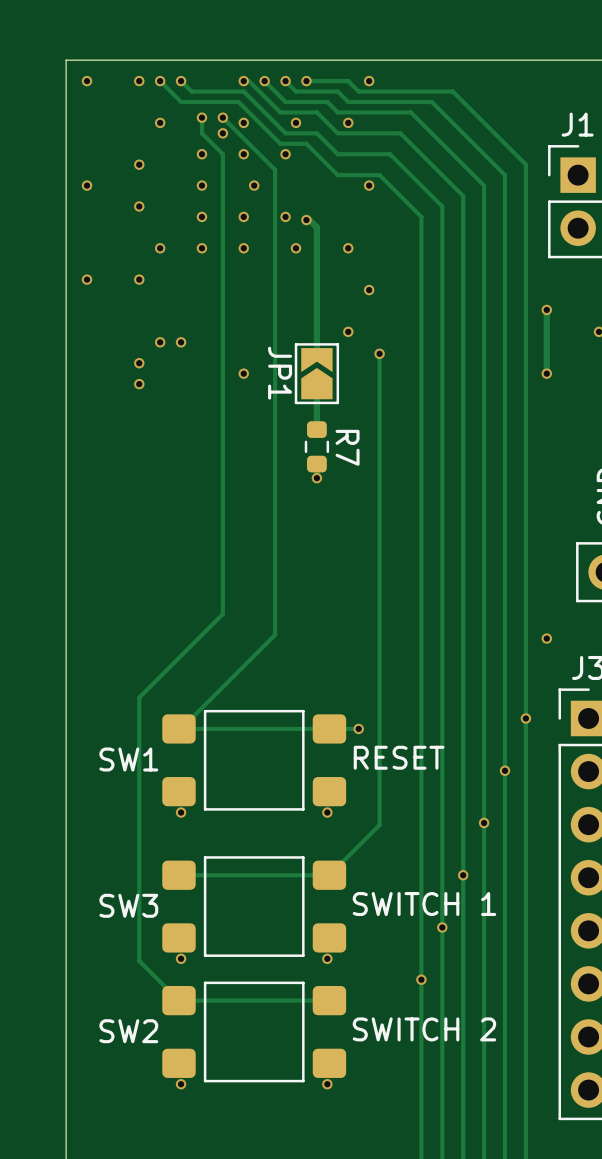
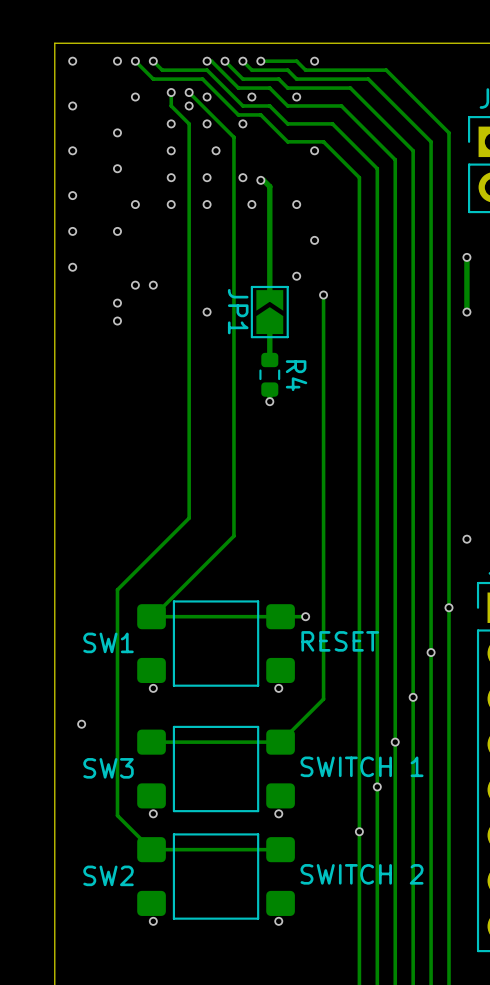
via: none -> (72, 105)
via: none -> (72, 195)
via: none -> (72, 267)
R7 name: R7 (347, 447) -> R4 (296, 375)
via: none -> (81, 724)

